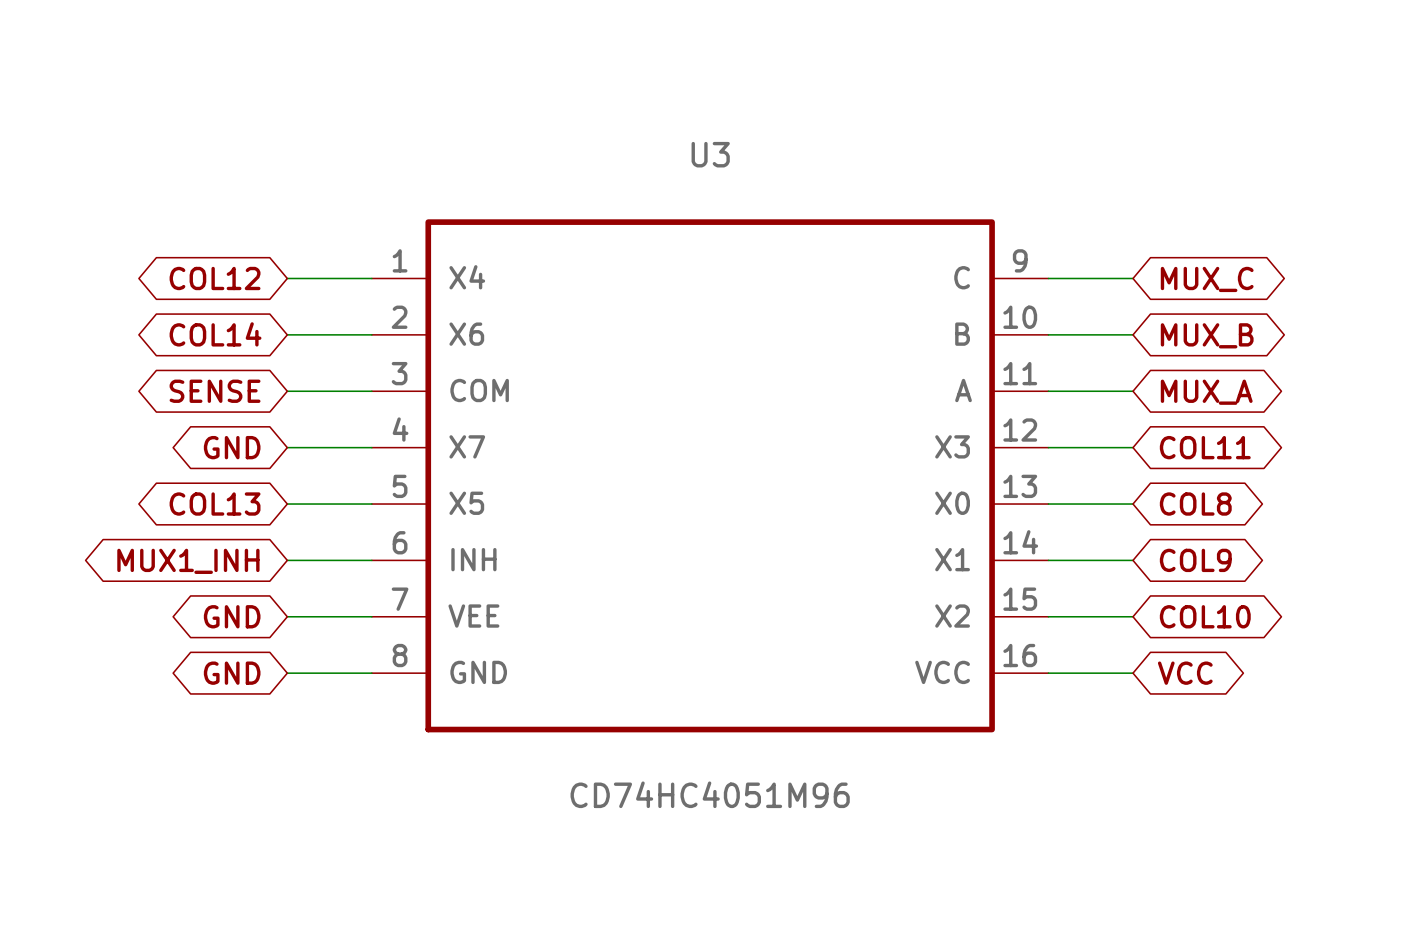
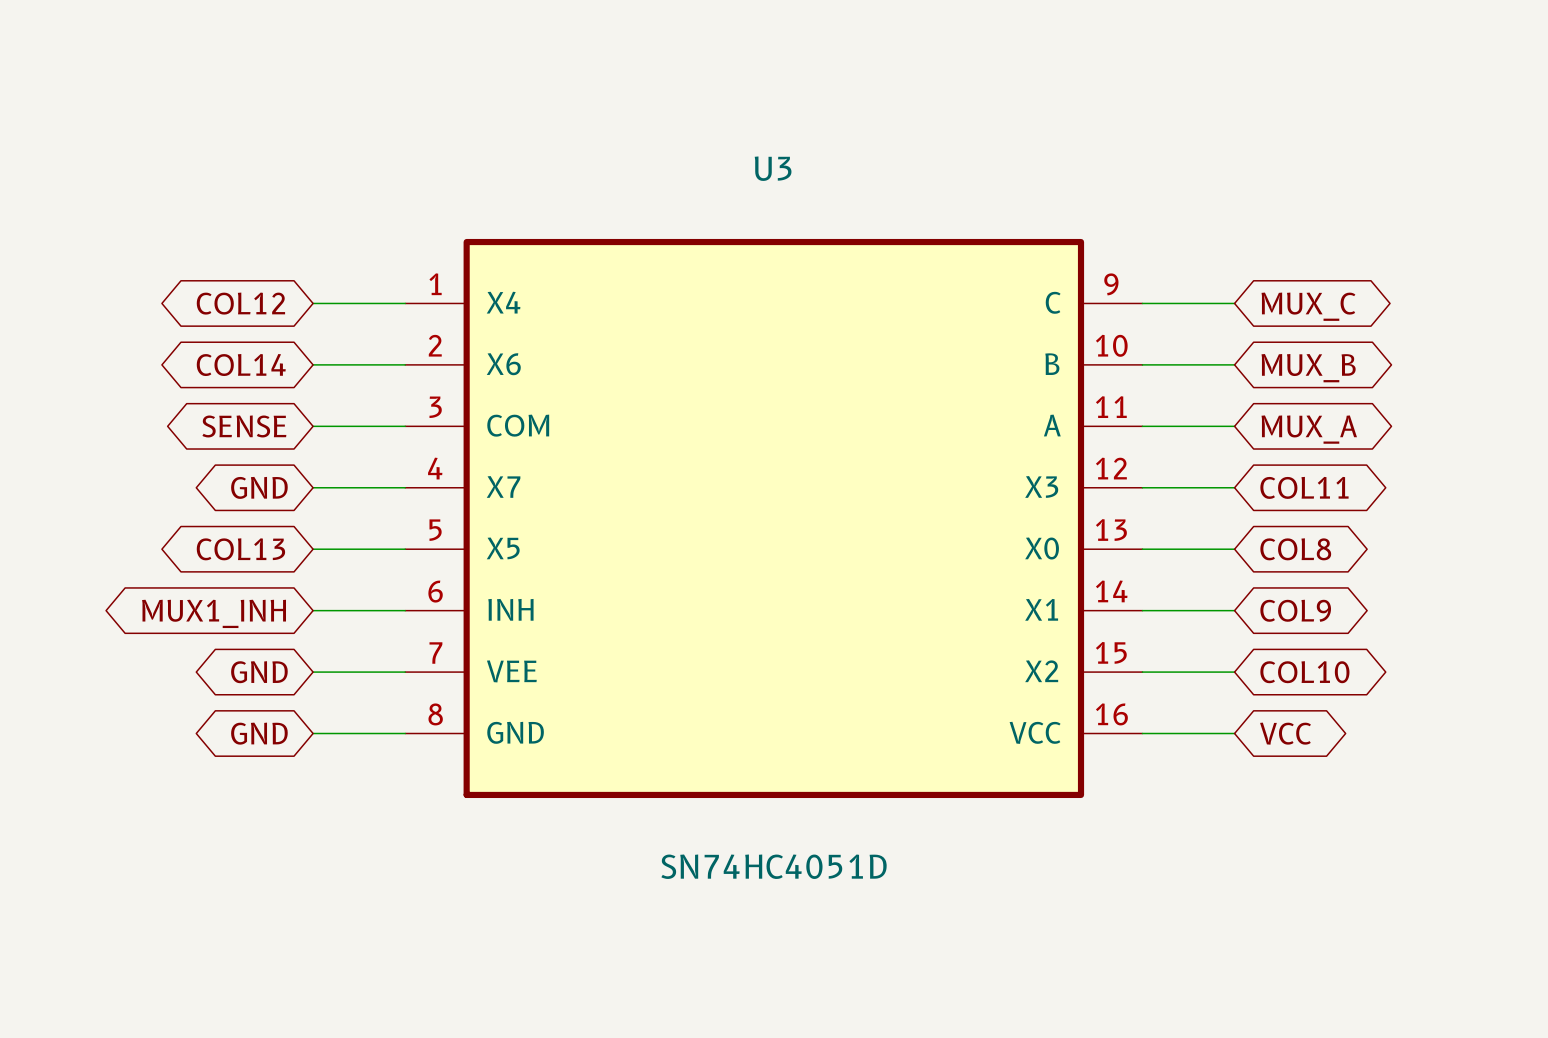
U3 value: CD74HC4051M96 (710, 794) -> SN74HC4051D (774, 866)

